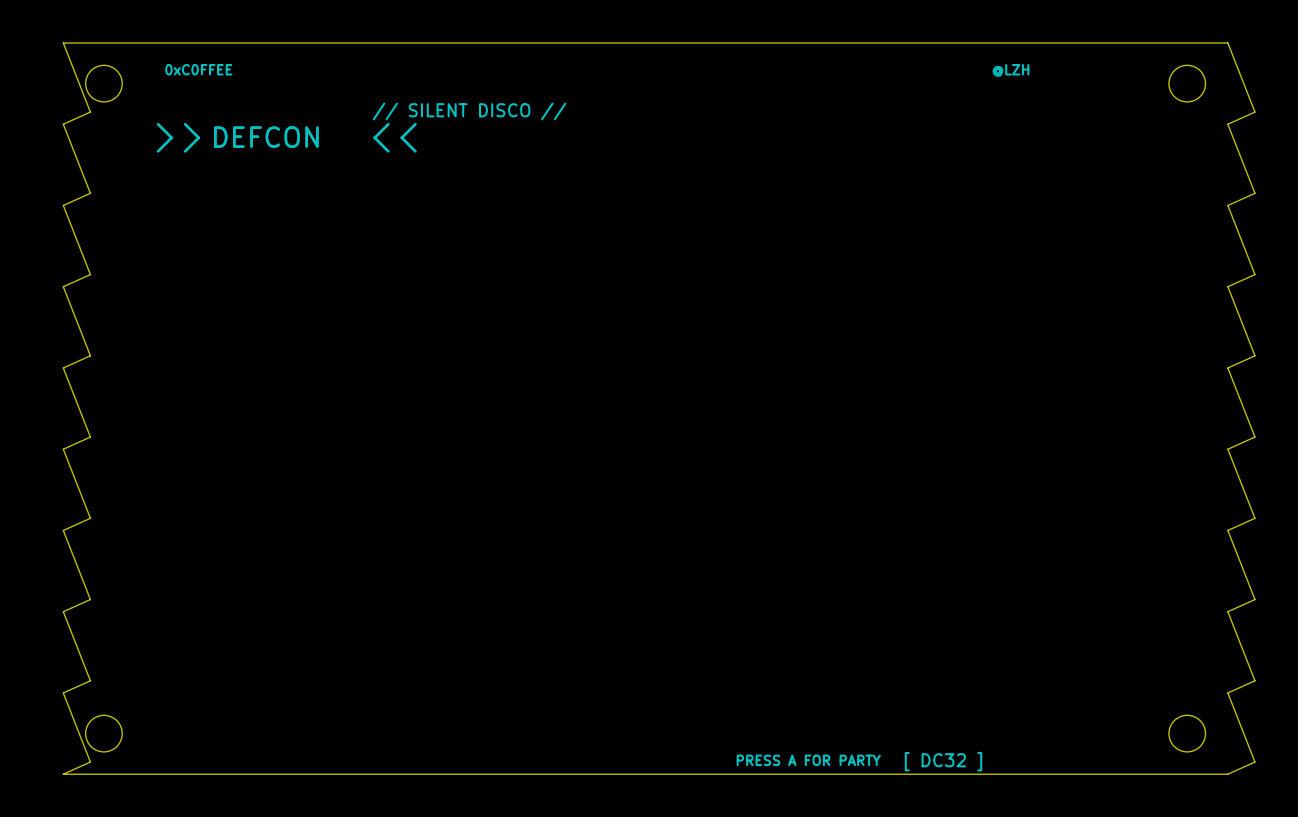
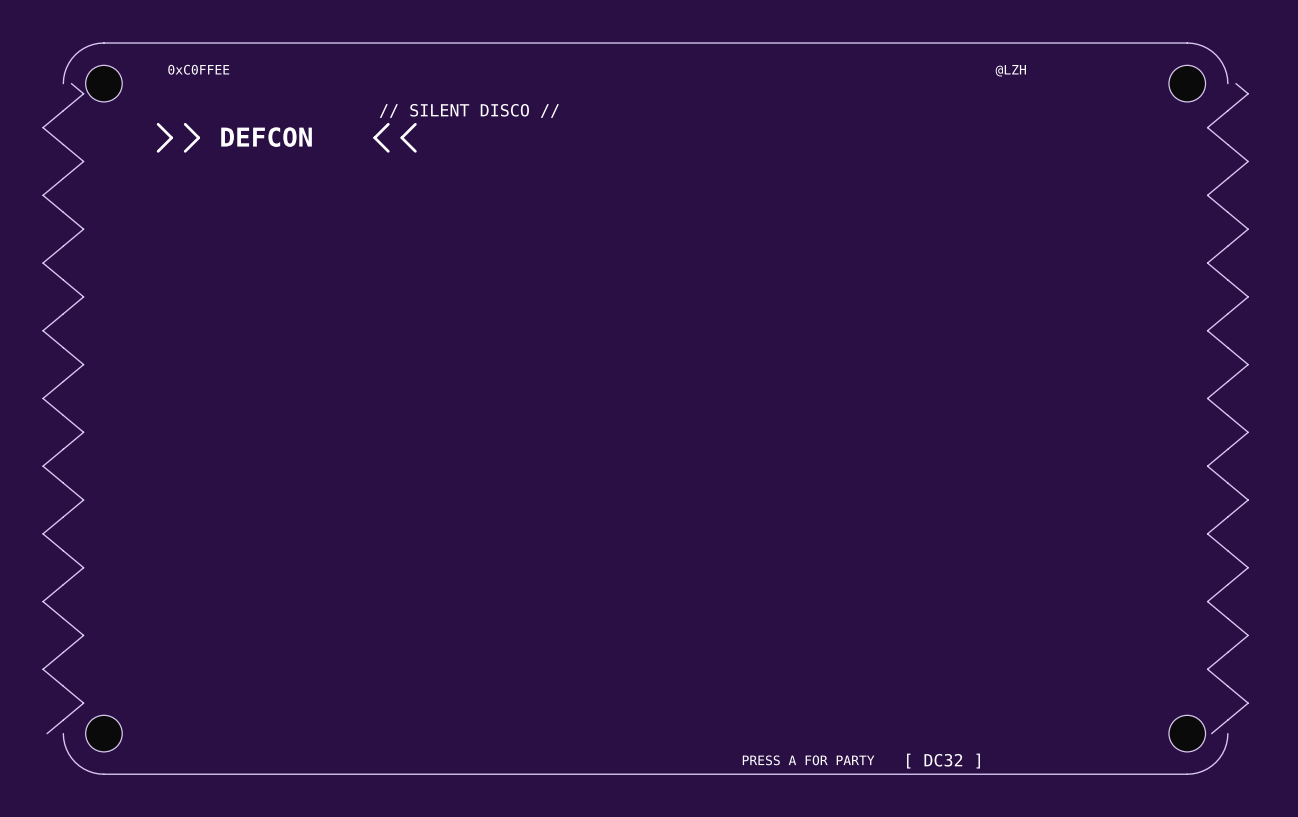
board edge: (103, 43) (63, 43) (90, 112) (63, 124) (90, 193) (63, 205) (90, 274) (63, 286) (90, 355) (63, 368) (90, 437) (63, 449) (90, 518) (63, 530) (90, 599) (63, 611) (90, 680) (63, 692) (90, 762) (63, 774) (103, 774) -> (103, 43) (88, 46) (75, 54) (66, 68) (63, 83)
board edge: (1187, 43) (1227, 43) (1254, 112) (1227, 124) (1254, 193) (1227, 205) (1254, 274) (1227, 286) (1254, 355) (1227, 368) (1254, 437) (1227, 449) (1254, 518) (1227, 530) (1254, 599) (1227, 611) (1254, 680) (1227, 692) (1254, 762) (1227, 774) (1187, 774) -> (1187, 43) (1202, 46) (1215, 54) (1224, 68) (1227, 83)
board edge: none -> (71, 83) (83, 93) (43, 127) (83, 161) (43, 195) (83, 229) (43, 263) (83, 296) (43, 330) (83, 364) (43, 398) (83, 432) (43, 466) (83, 500) (43, 533) (83, 567) (43, 601) (83, 635) (43, 669) (83, 703) (47, 733)
board edge: none -> (1235, 83) (1248, 93) (1207, 127) (1248, 161) (1207, 195) (1248, 229) (1207, 263) (1248, 296) (1207, 330) (1248, 364) (1207, 398) (1248, 432) (1207, 466) (1248, 500) (1207, 533) (1248, 567) (1207, 601) (1248, 635) (1207, 669) (1248, 703) (1211, 733)
board edge: none -> (63, 733) (66, 749) (75, 762) (88, 771) (103, 774)
board edge: none -> (1227, 733) (1224, 749) (1215, 762) (1202, 771) (1187, 774)

